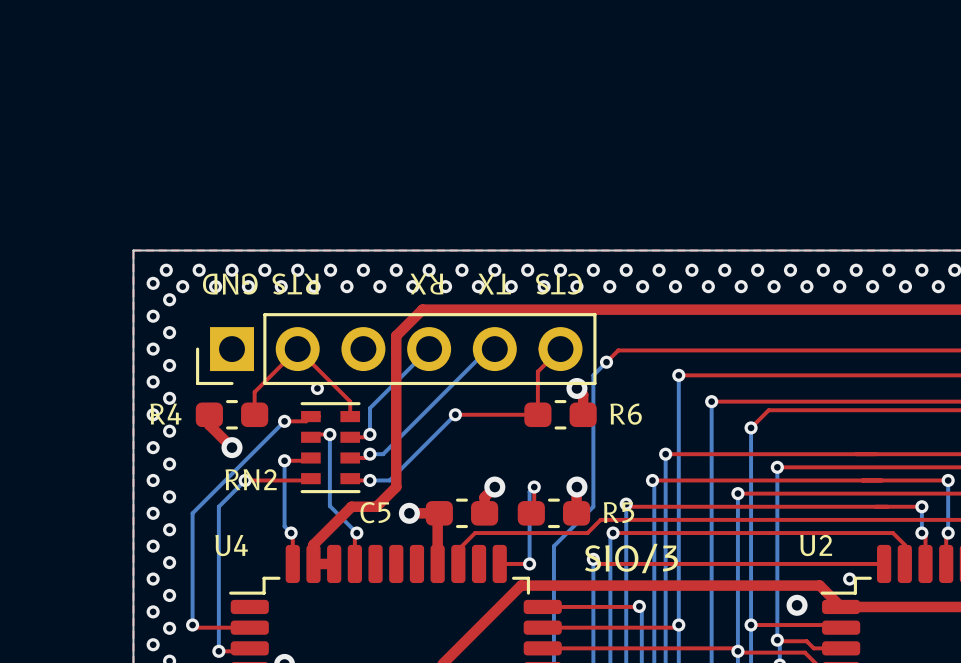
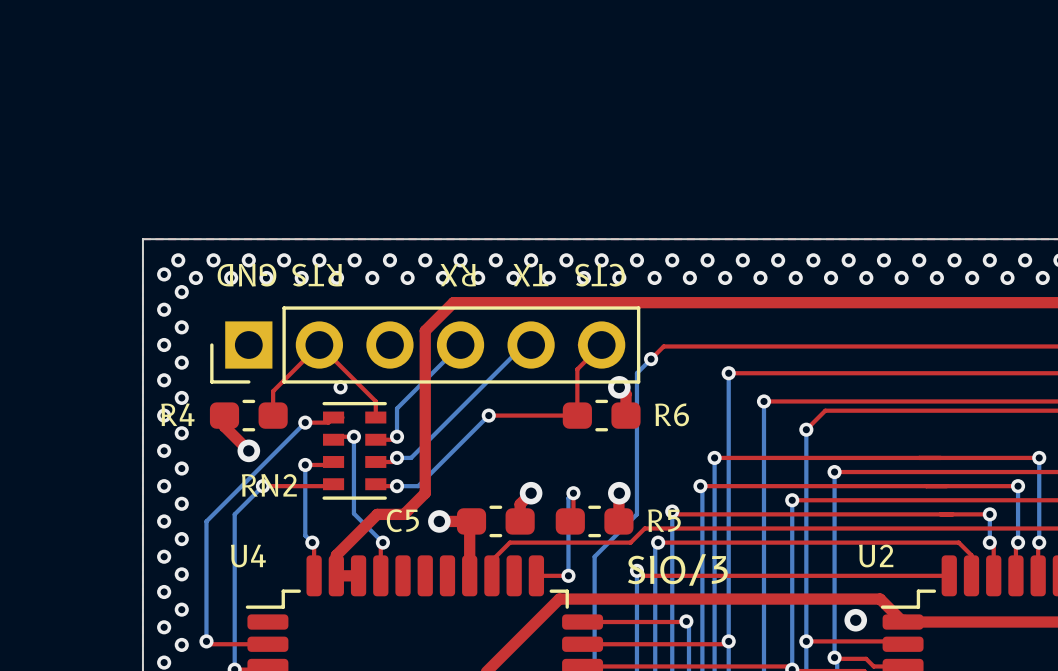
via: (849, 579) -> none

